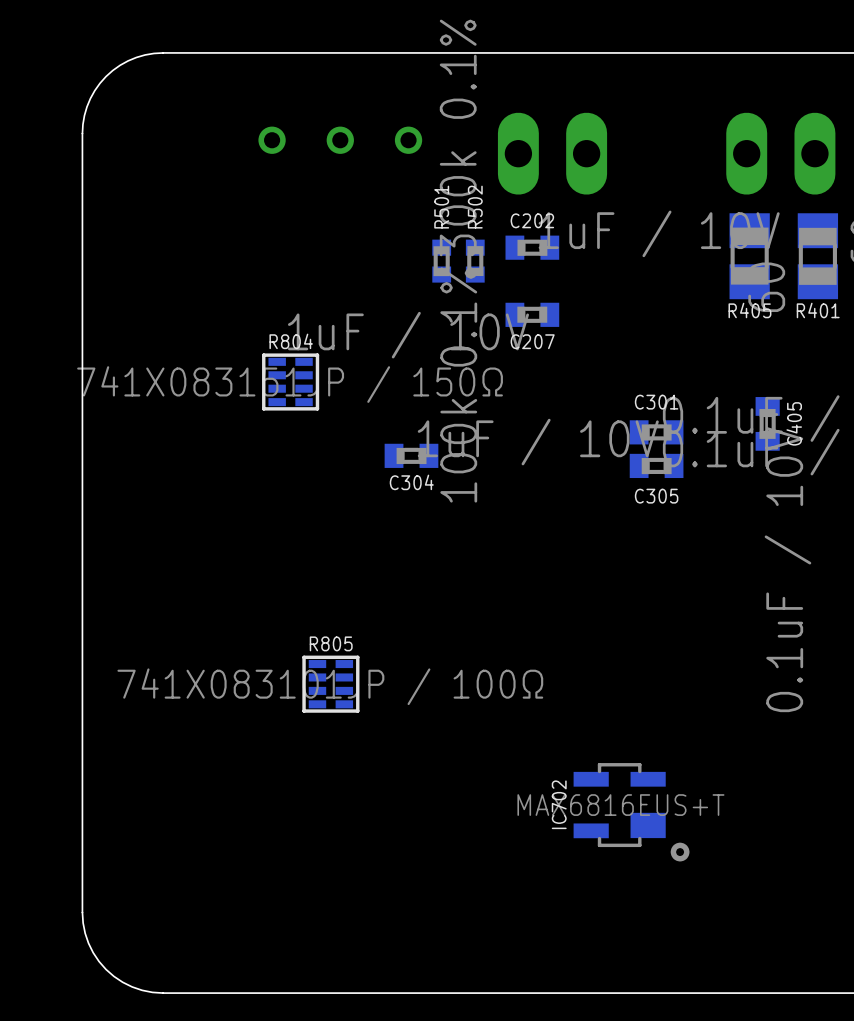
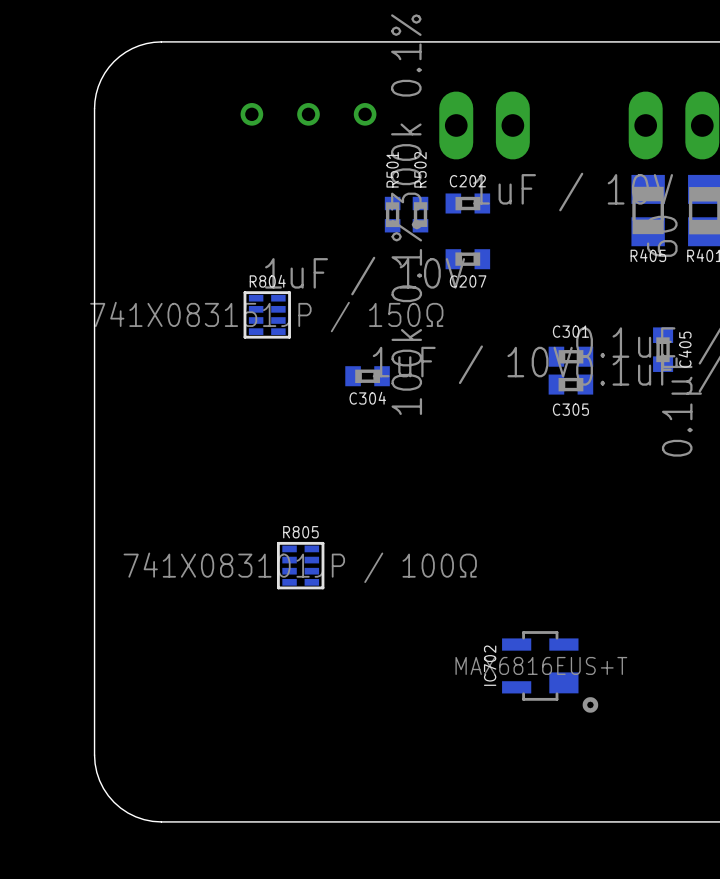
C405 value: 0.1uF / 10V (787, 569) -> 0.1μF (681, 405)

